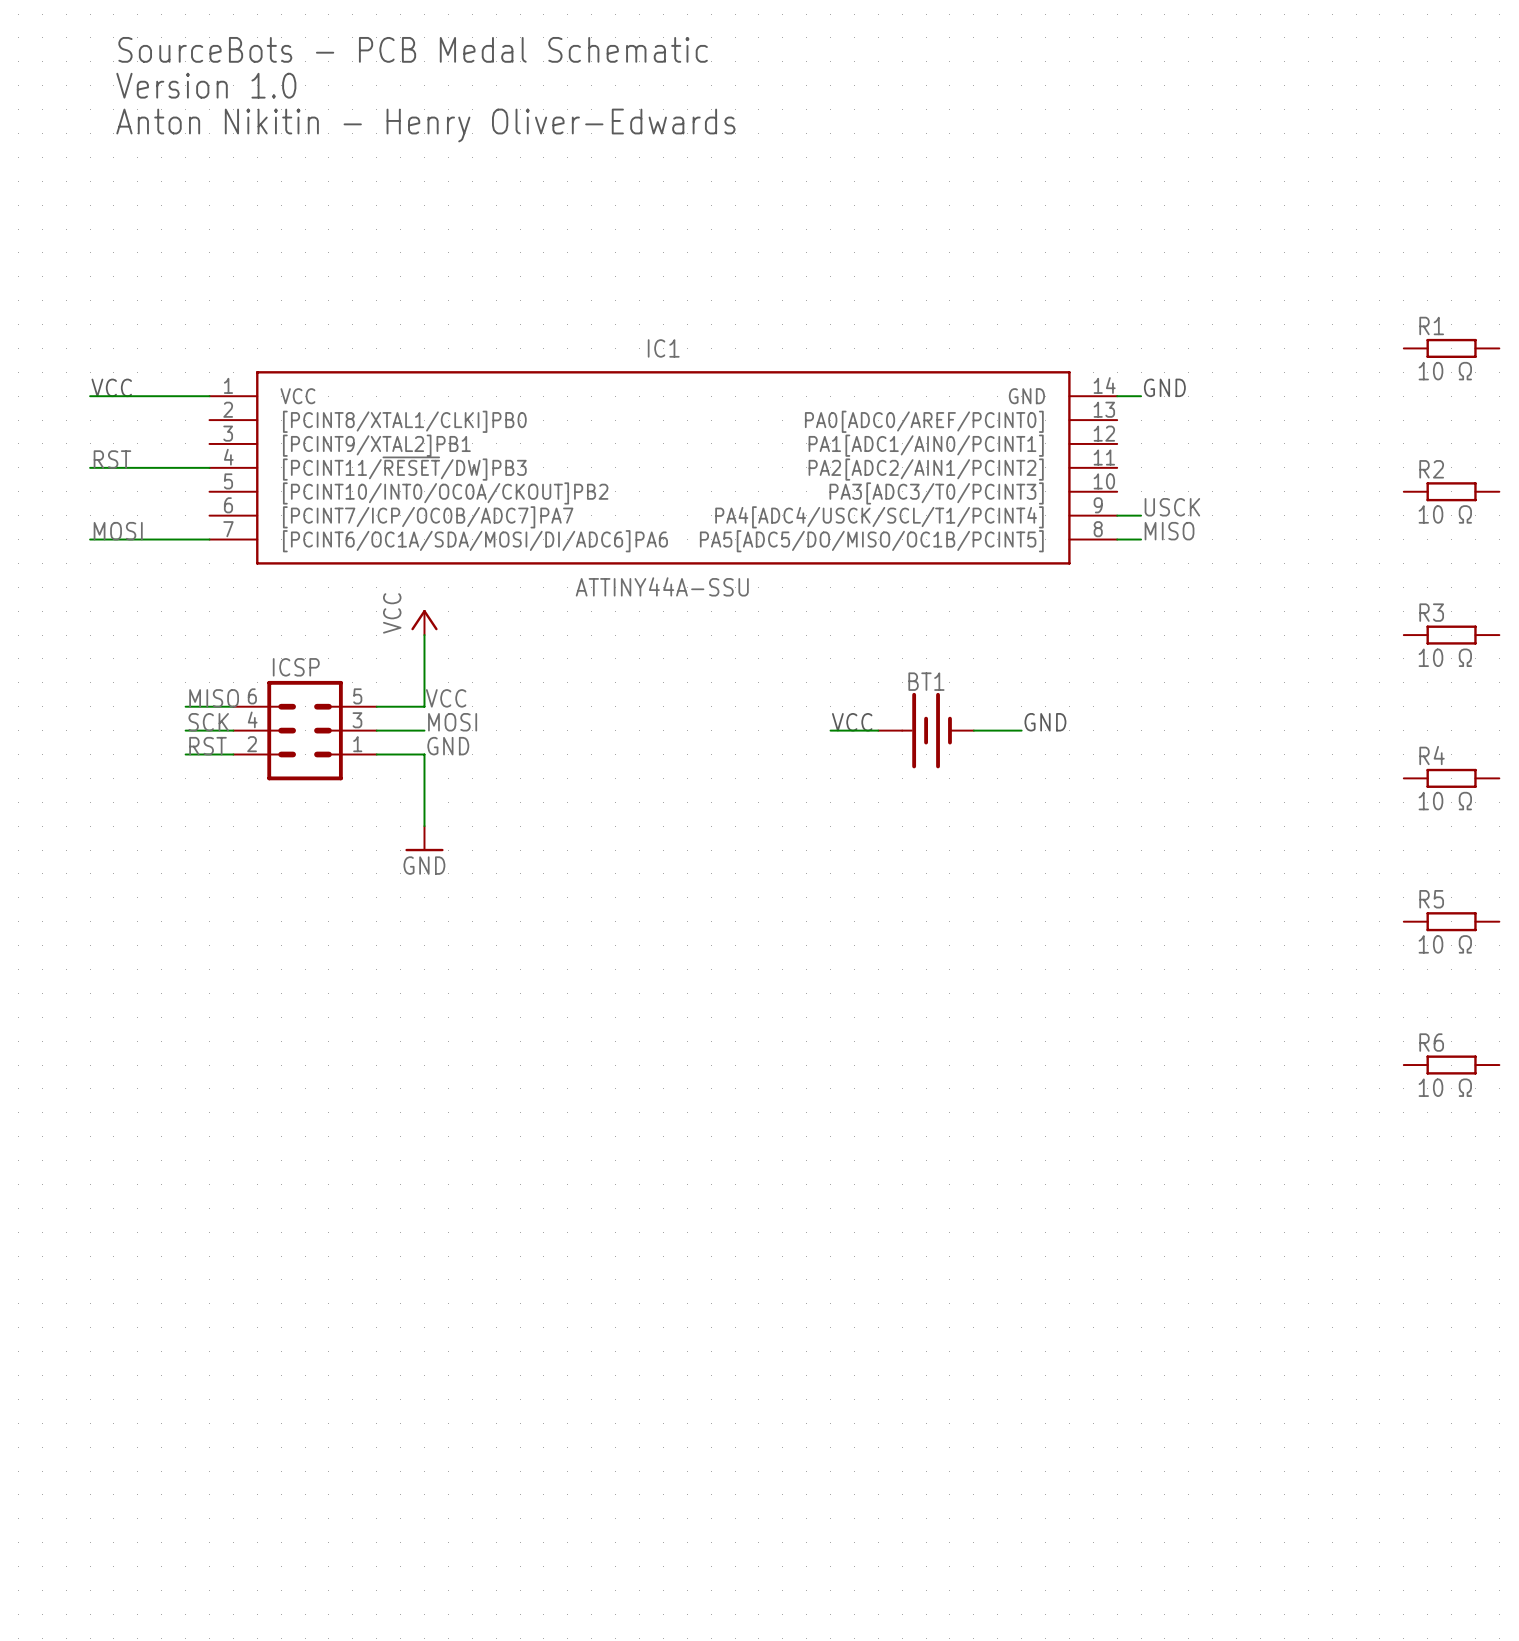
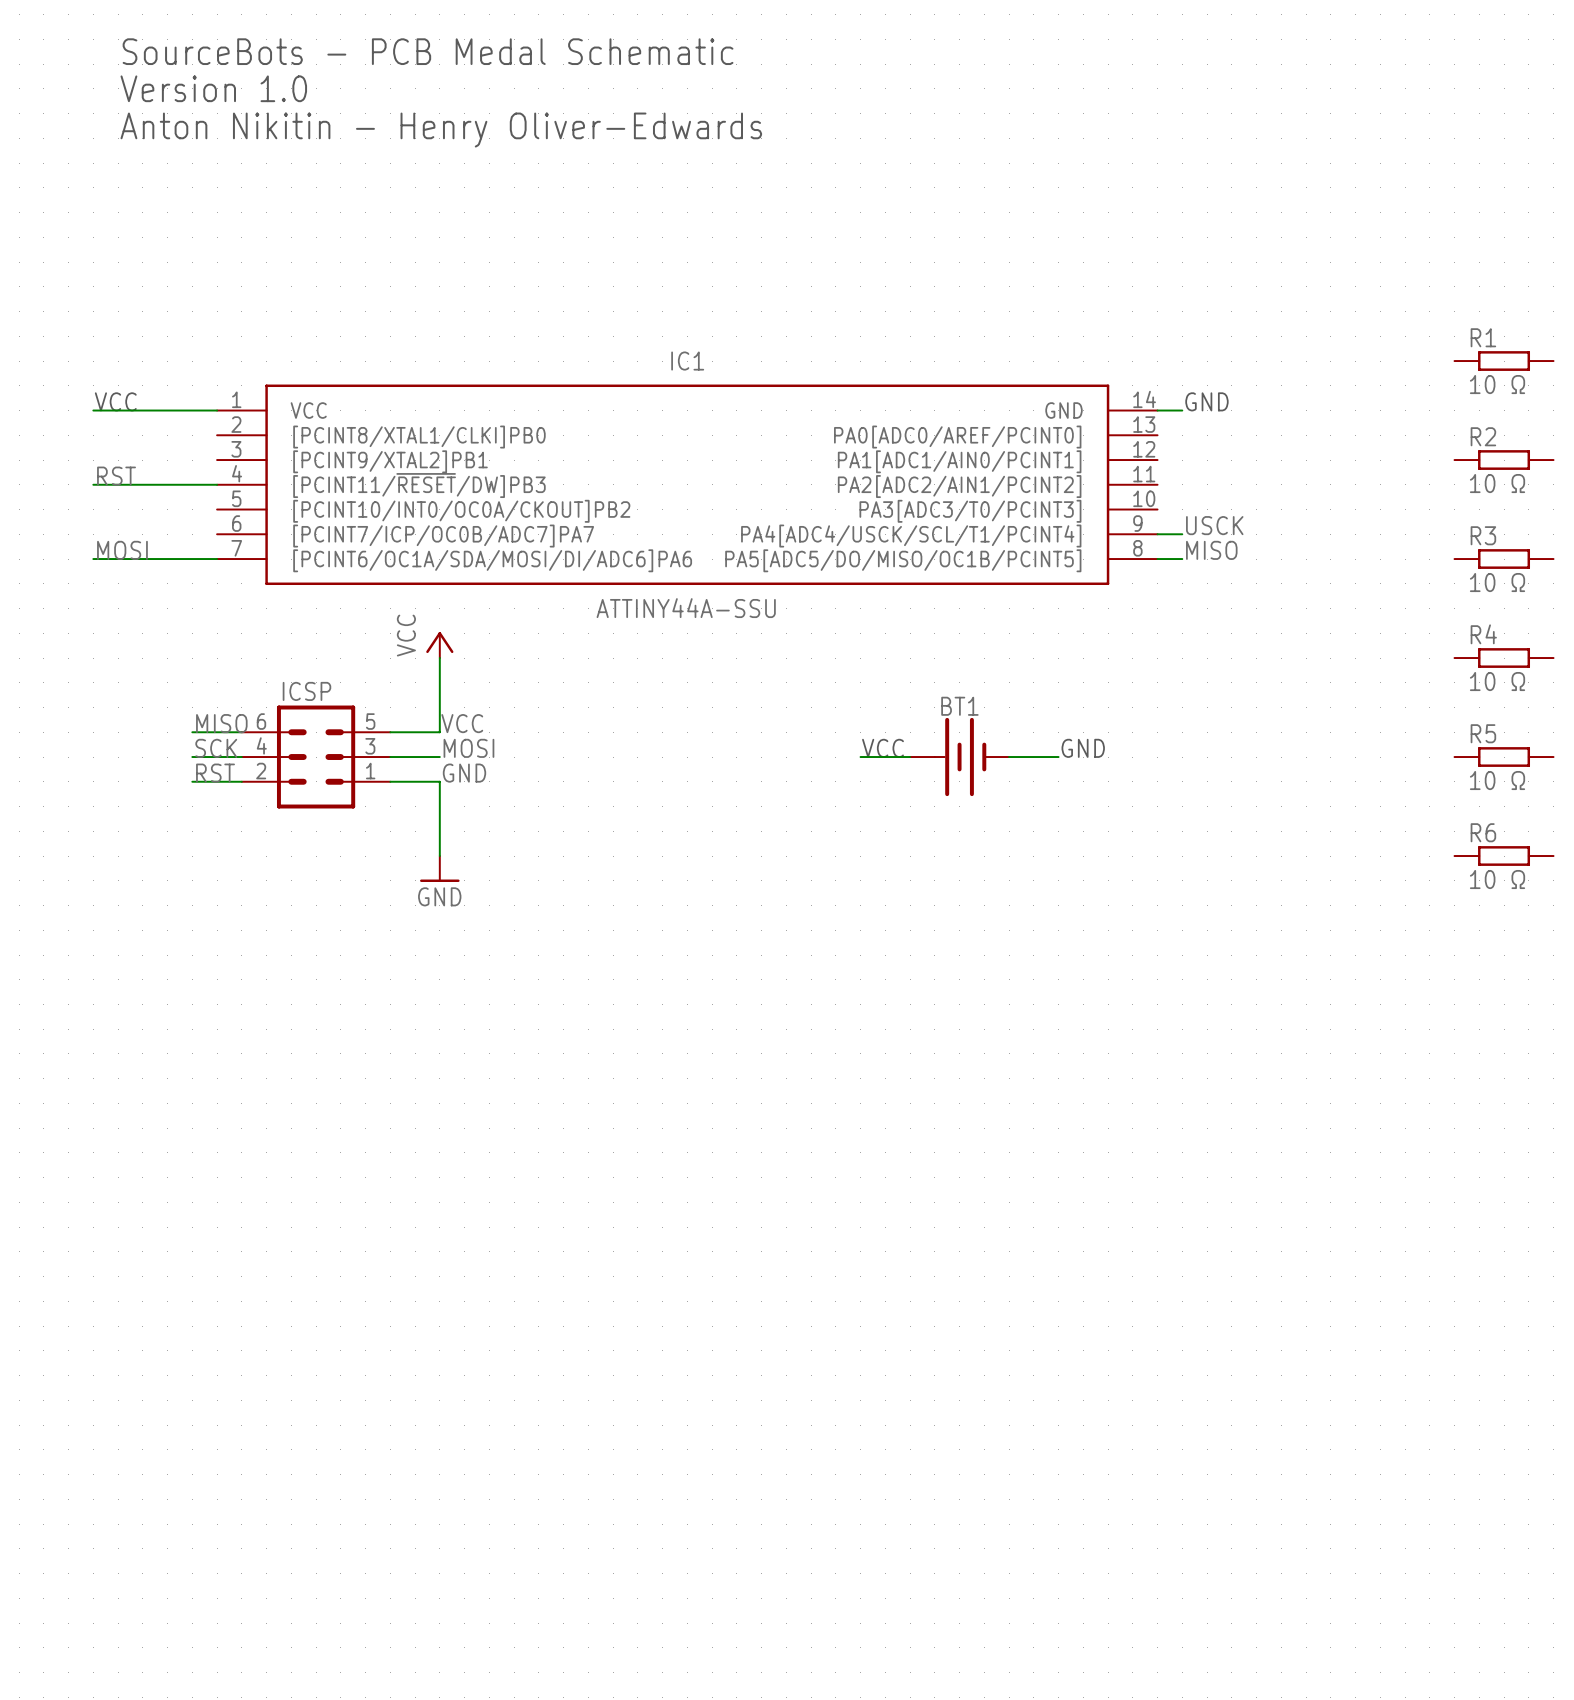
R2 position: (1451, 491) -> (1504, 460)
R3: none -> 10 Ω (1504, 559)
R3 name: R3 (1431, 612) -> R4 (1483, 634)
R4: 10 Ω (1451, 778) -> none
R5 position: (1451, 921) -> (1504, 757)
R6 position: (1451, 1065) -> (1504, 856)

